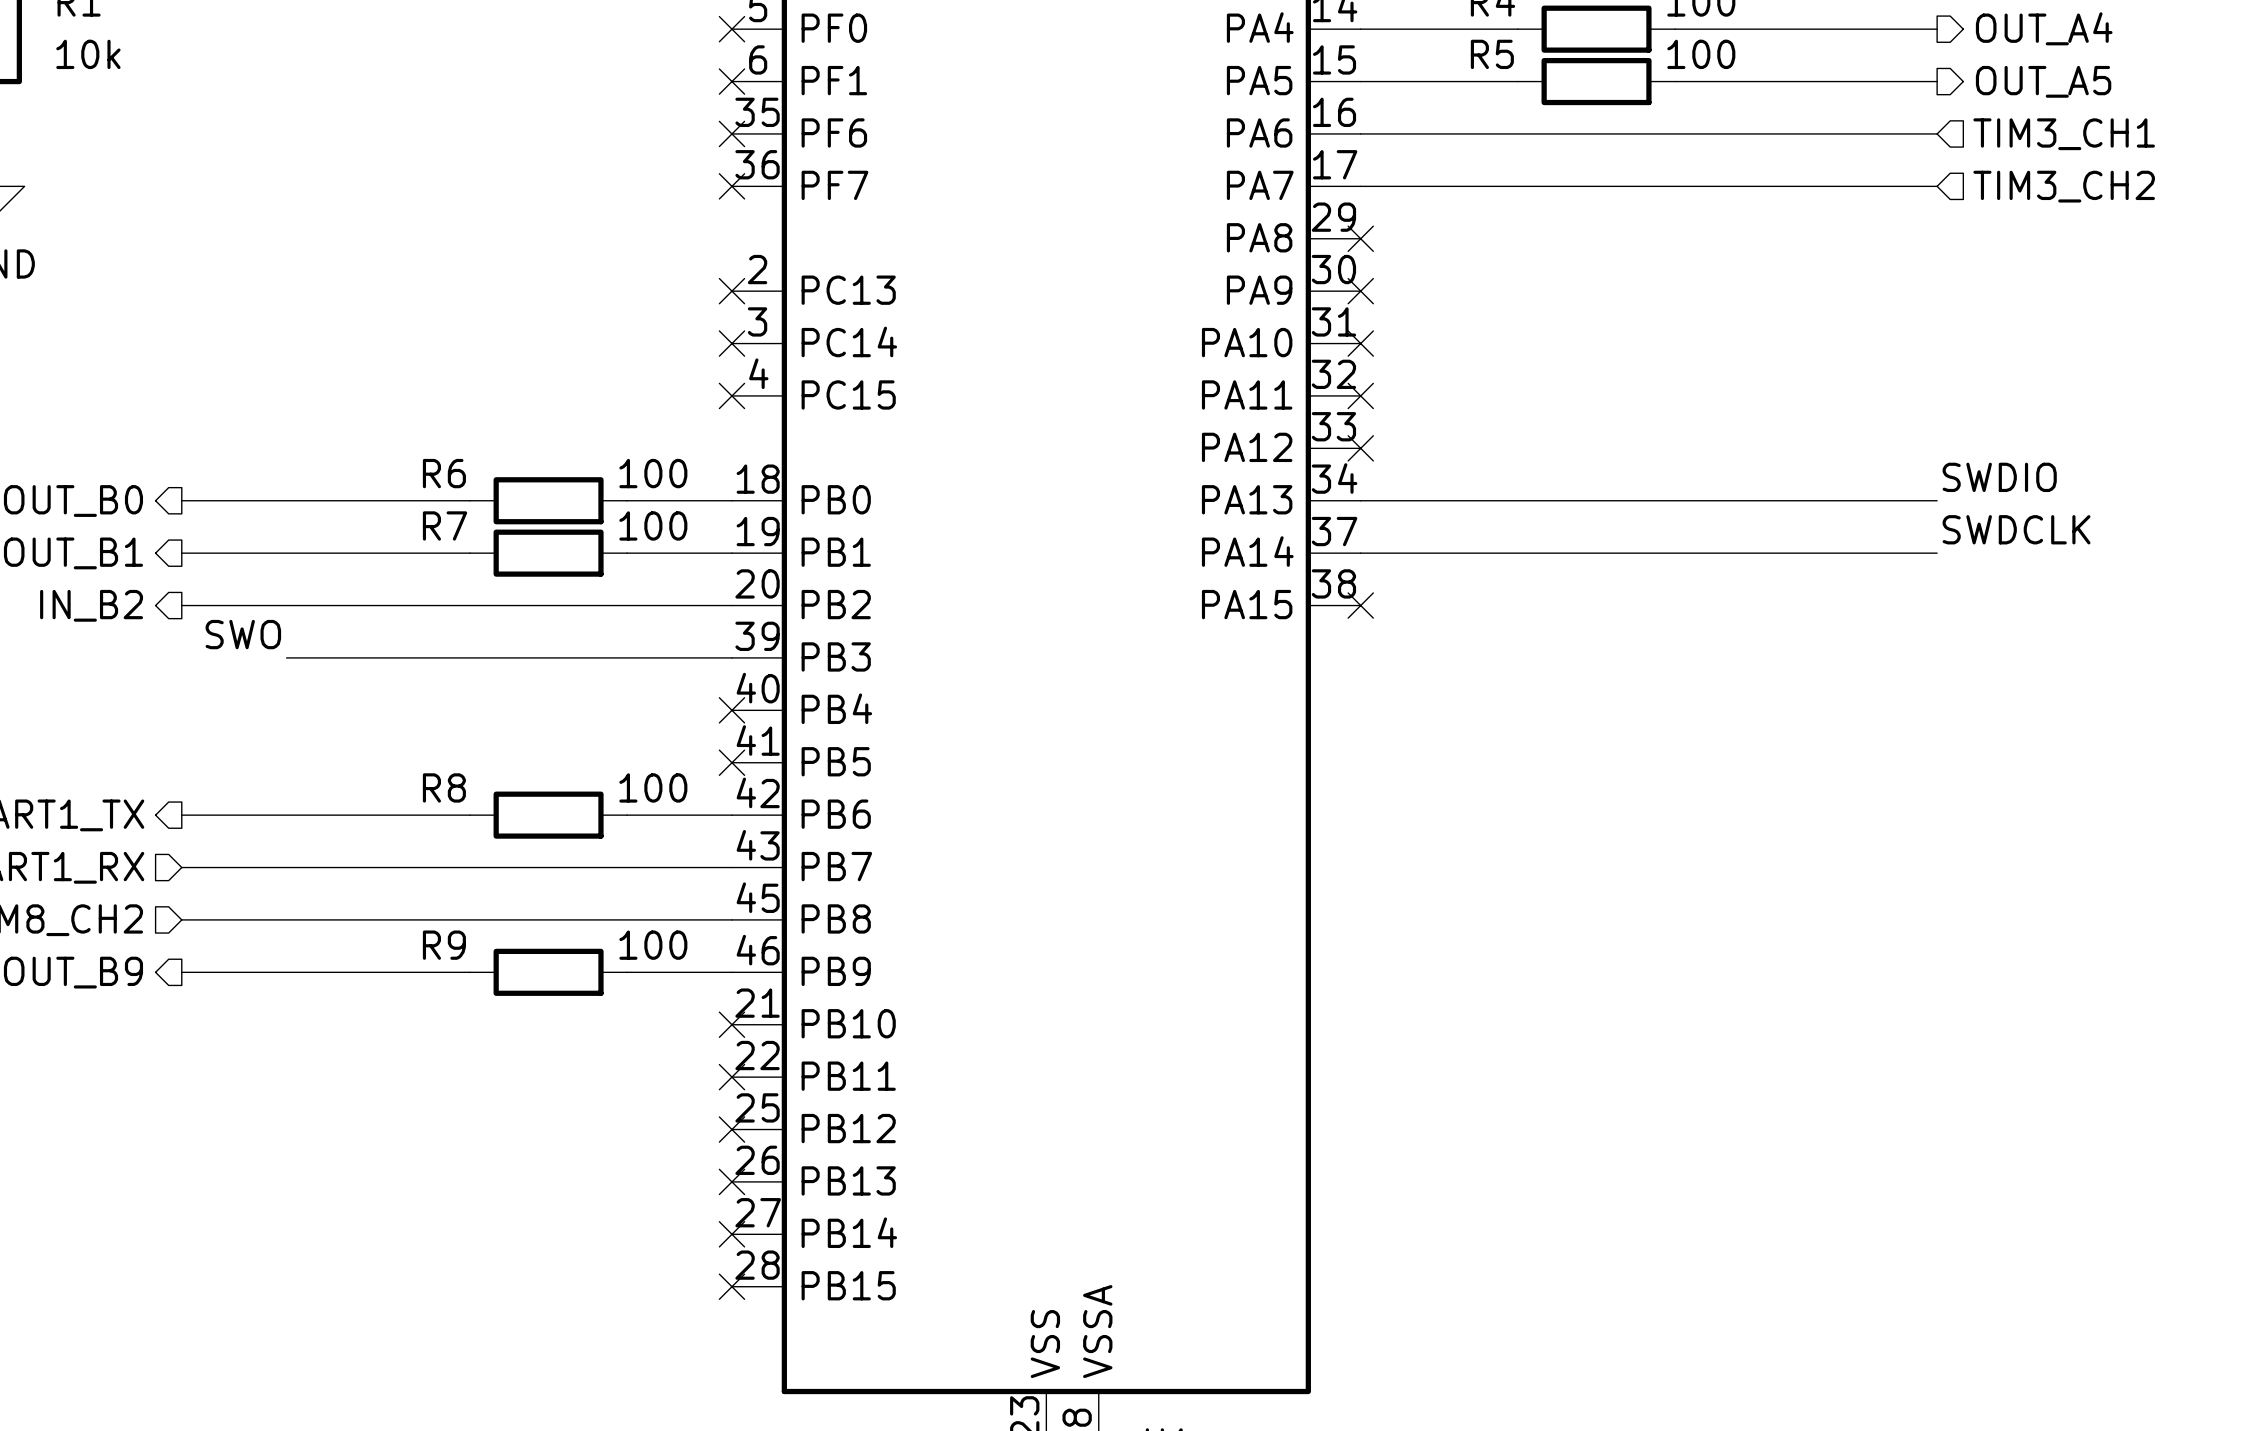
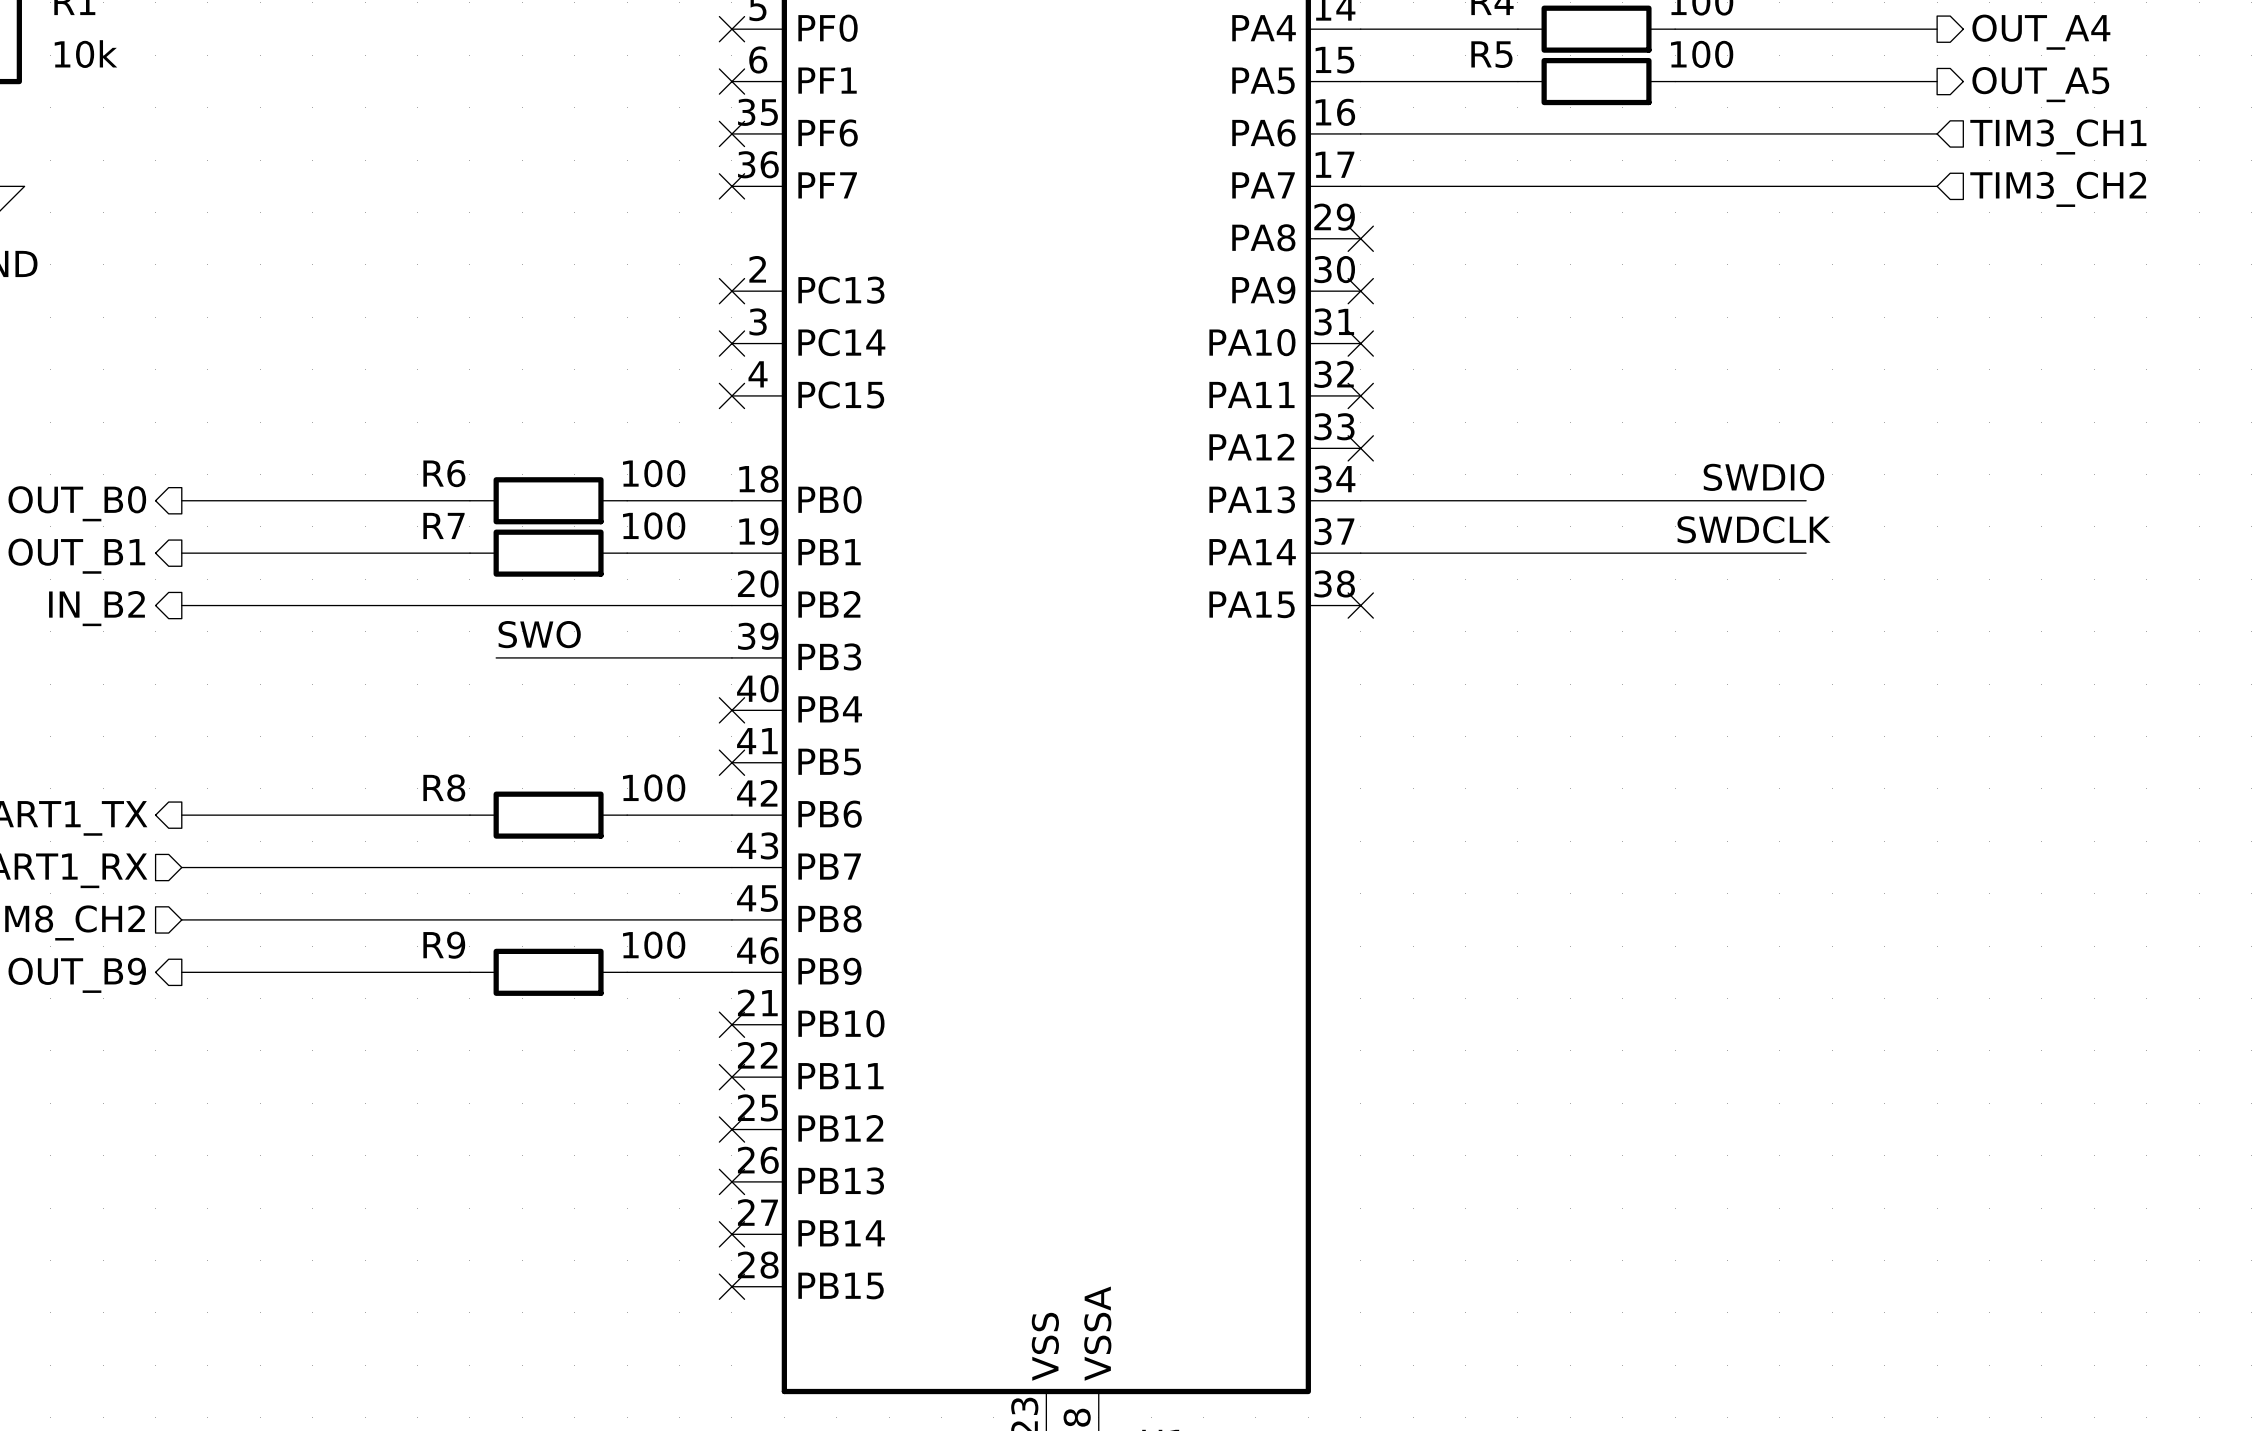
label position: SWDIO (1999, 477) -> SWDIO (1763, 477)
wire: (1806, 500) (1937, 500) -> none
label position: SWDCLK (2016, 529) -> SWDCLK (1754, 529)
wire: (1806, 553) (1937, 553) -> none
label position: SWO (243, 634) -> SWO (539, 634)
wire: (286, 657) (496, 657) -> none

